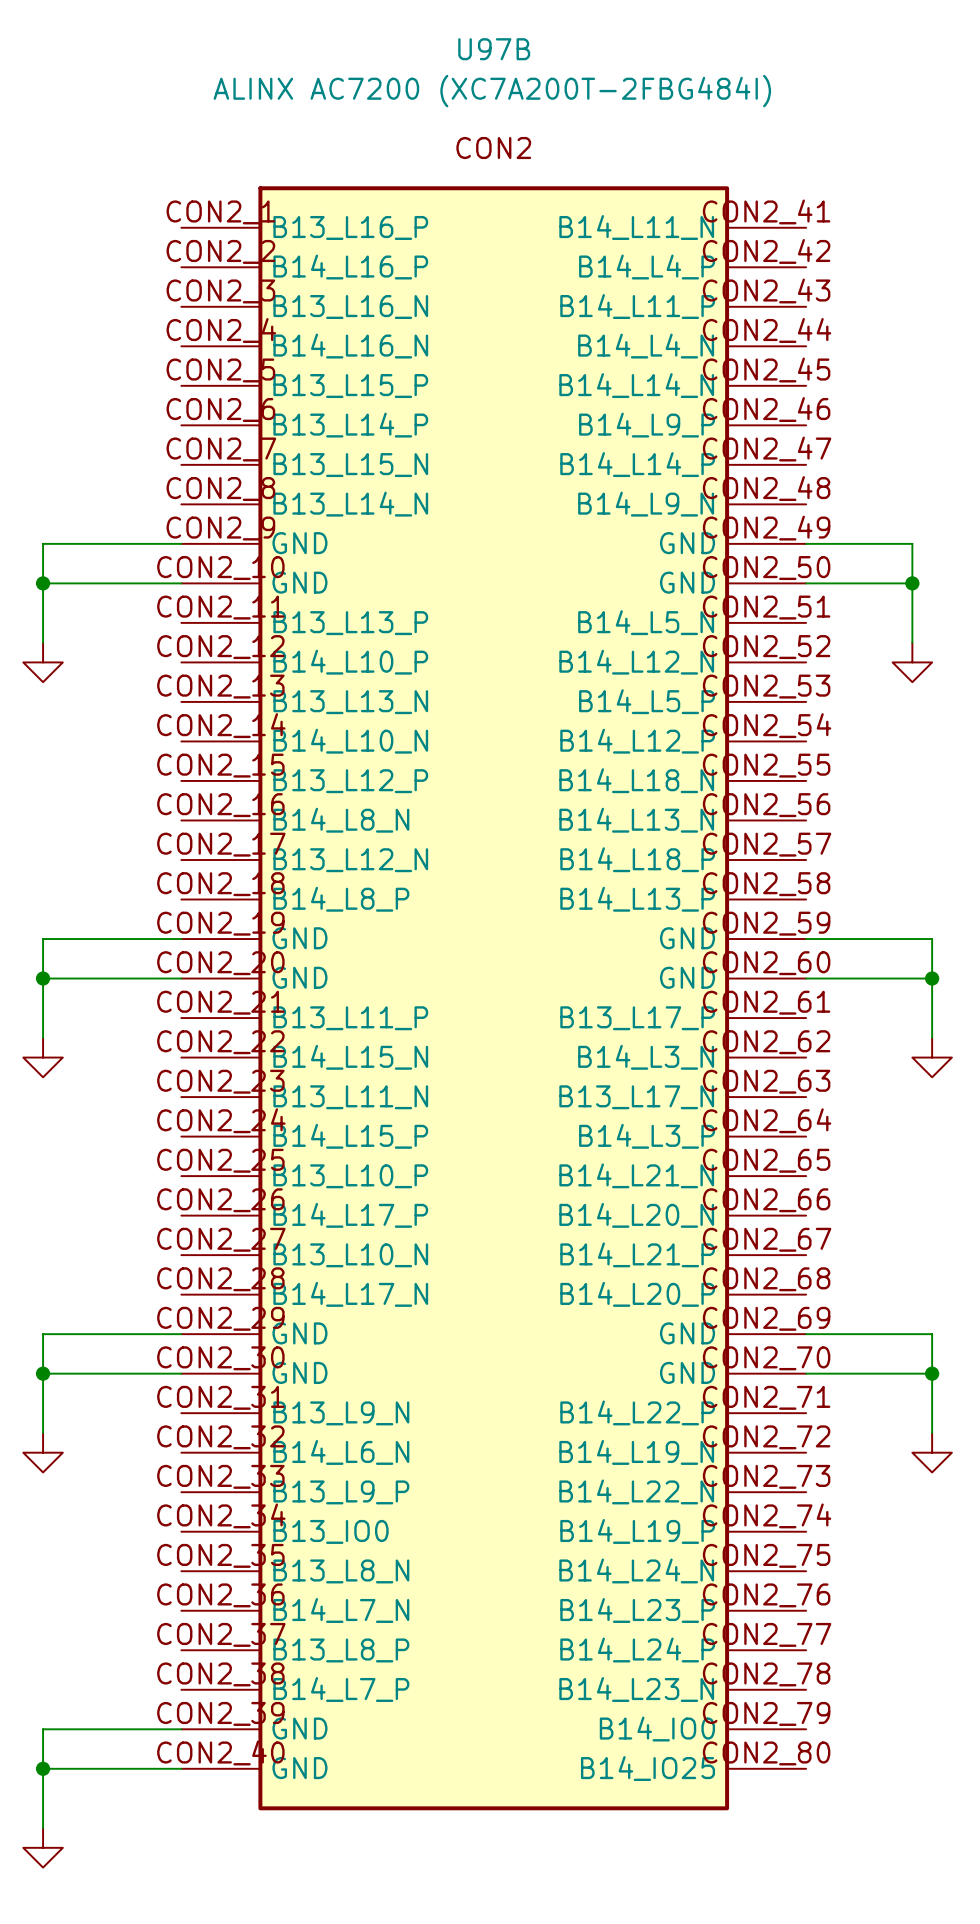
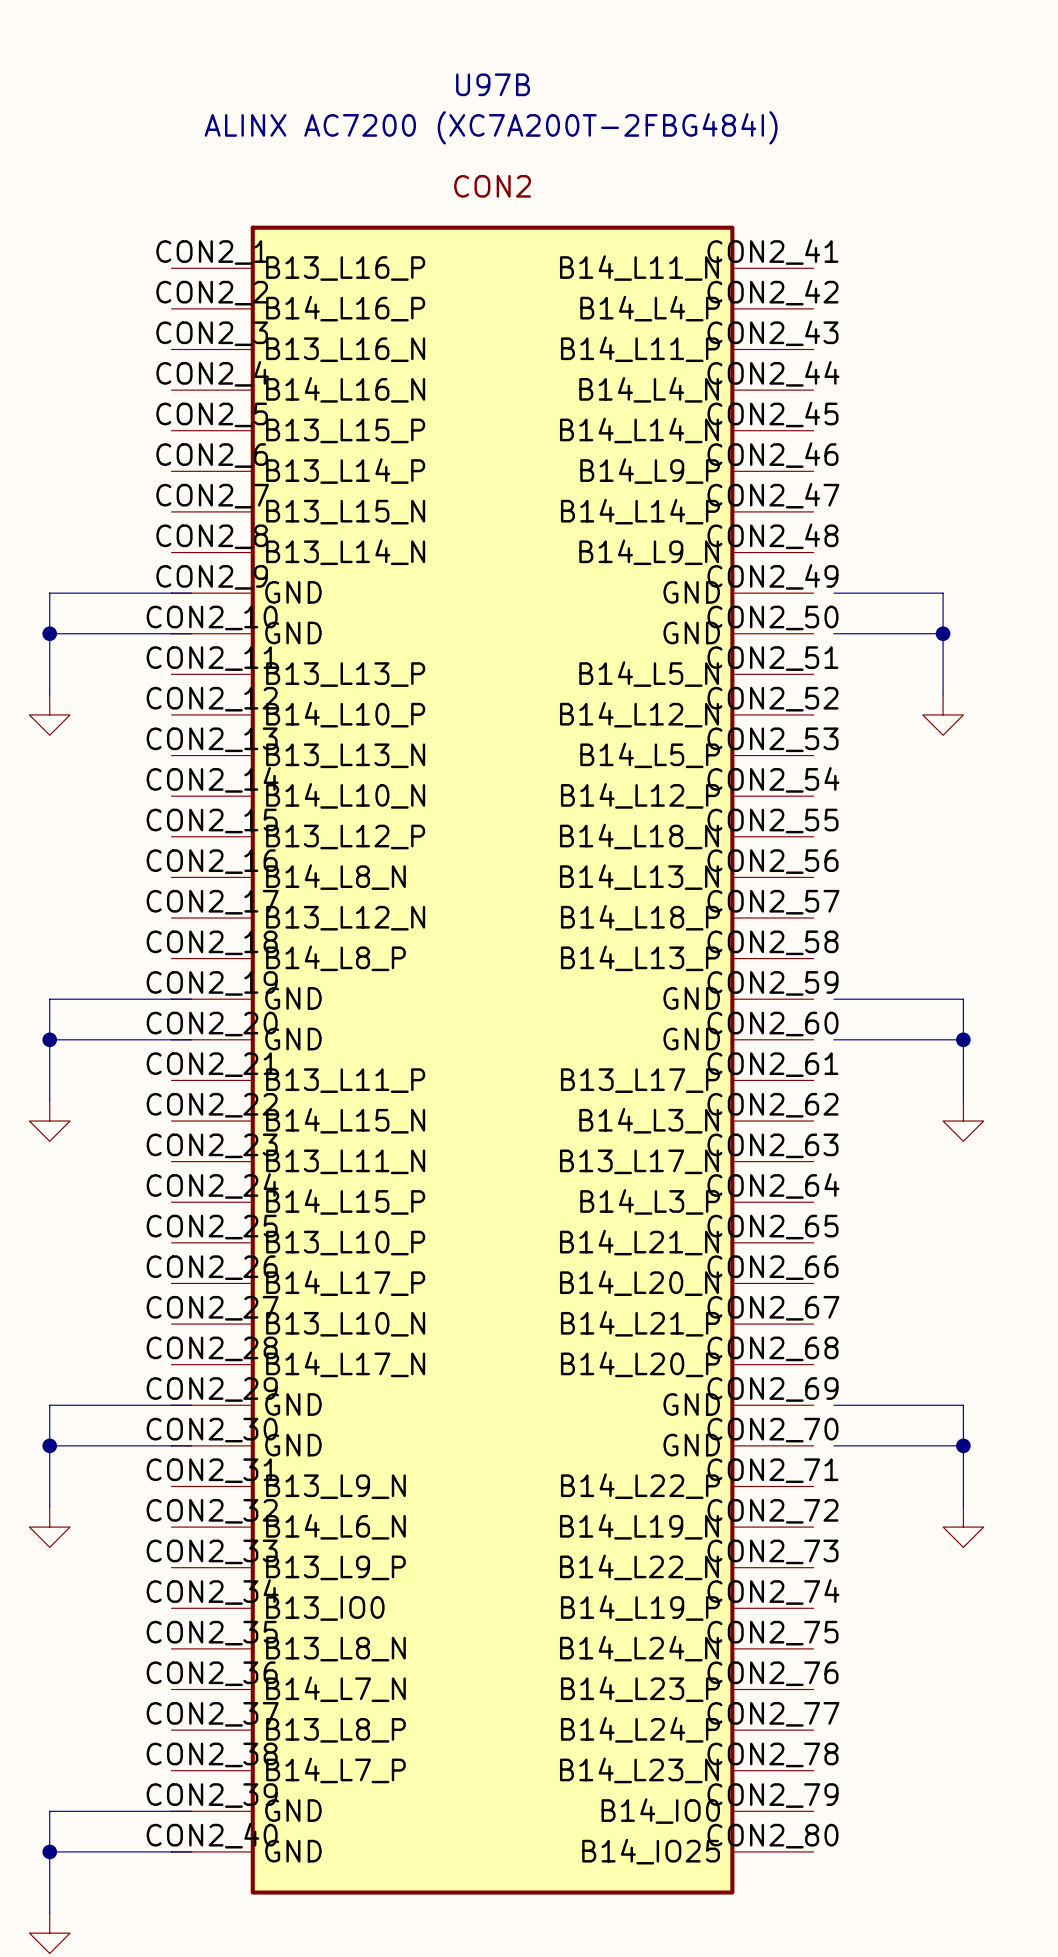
U97B position: (493, 998) -> (492, 1060)

